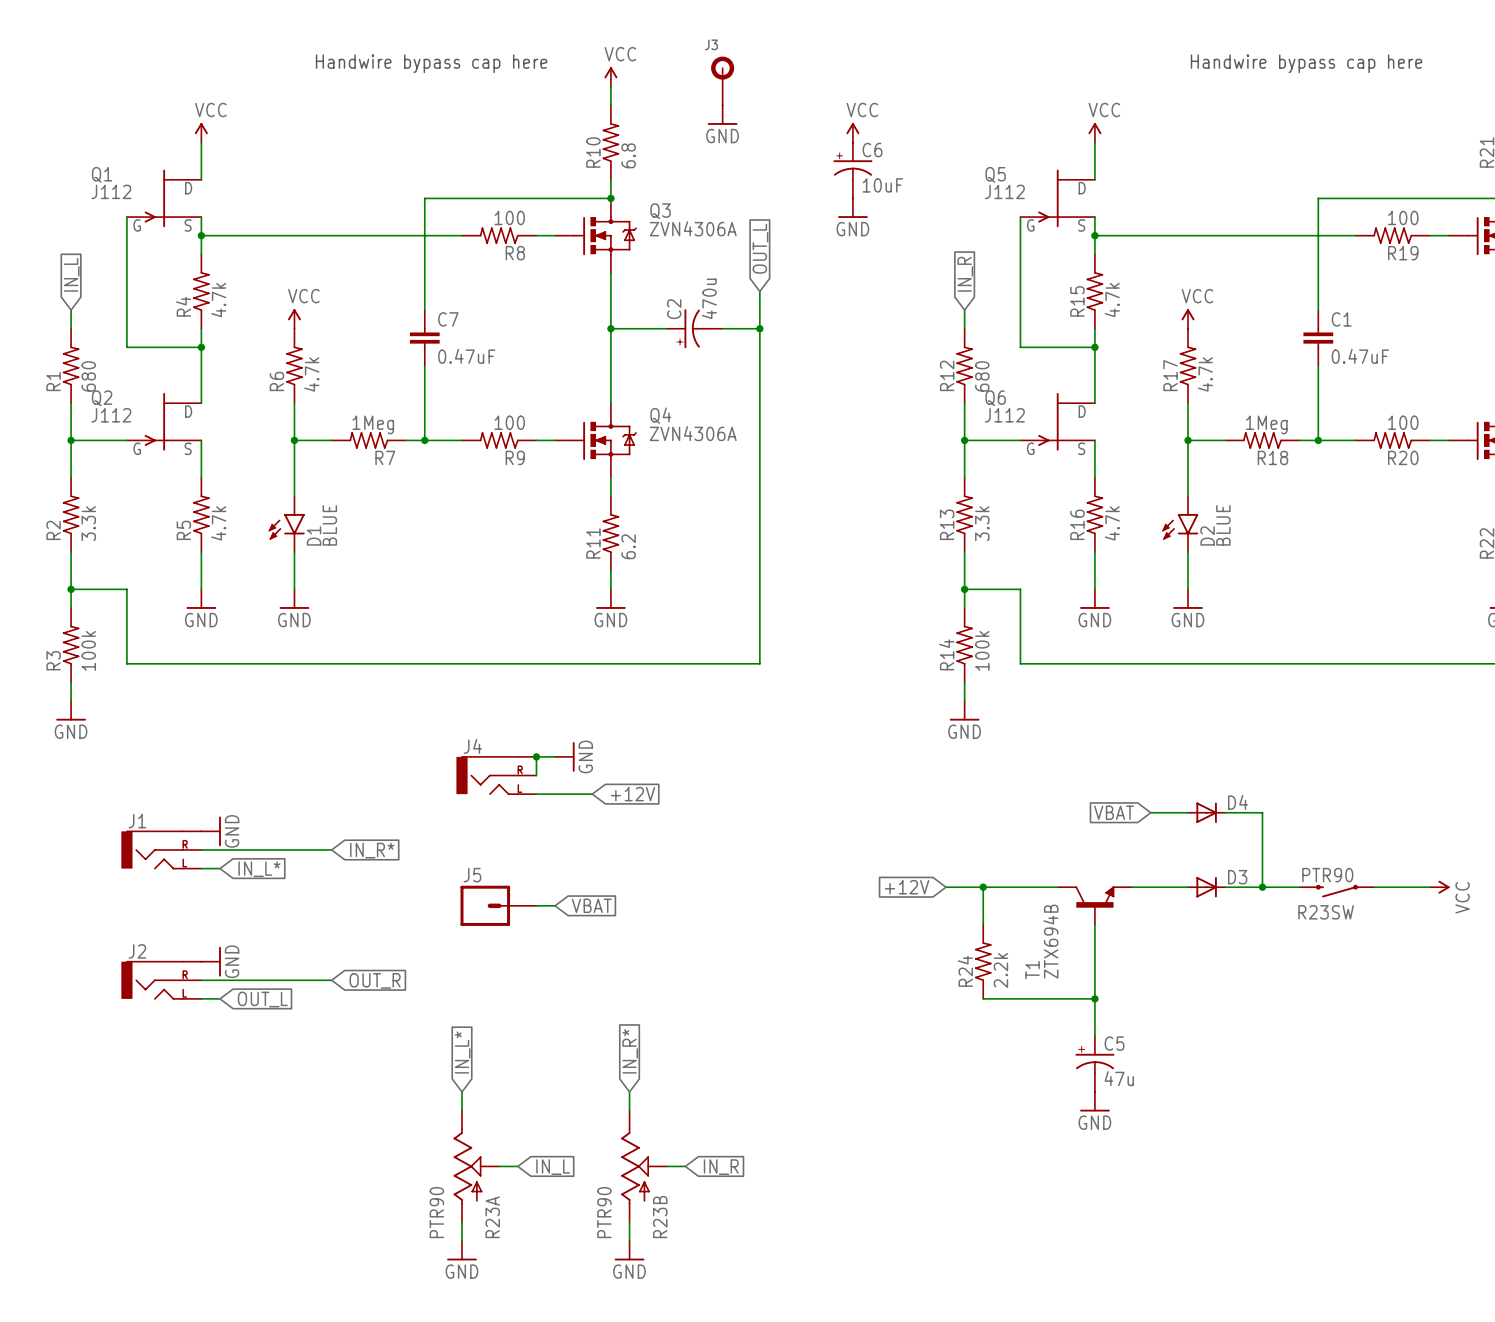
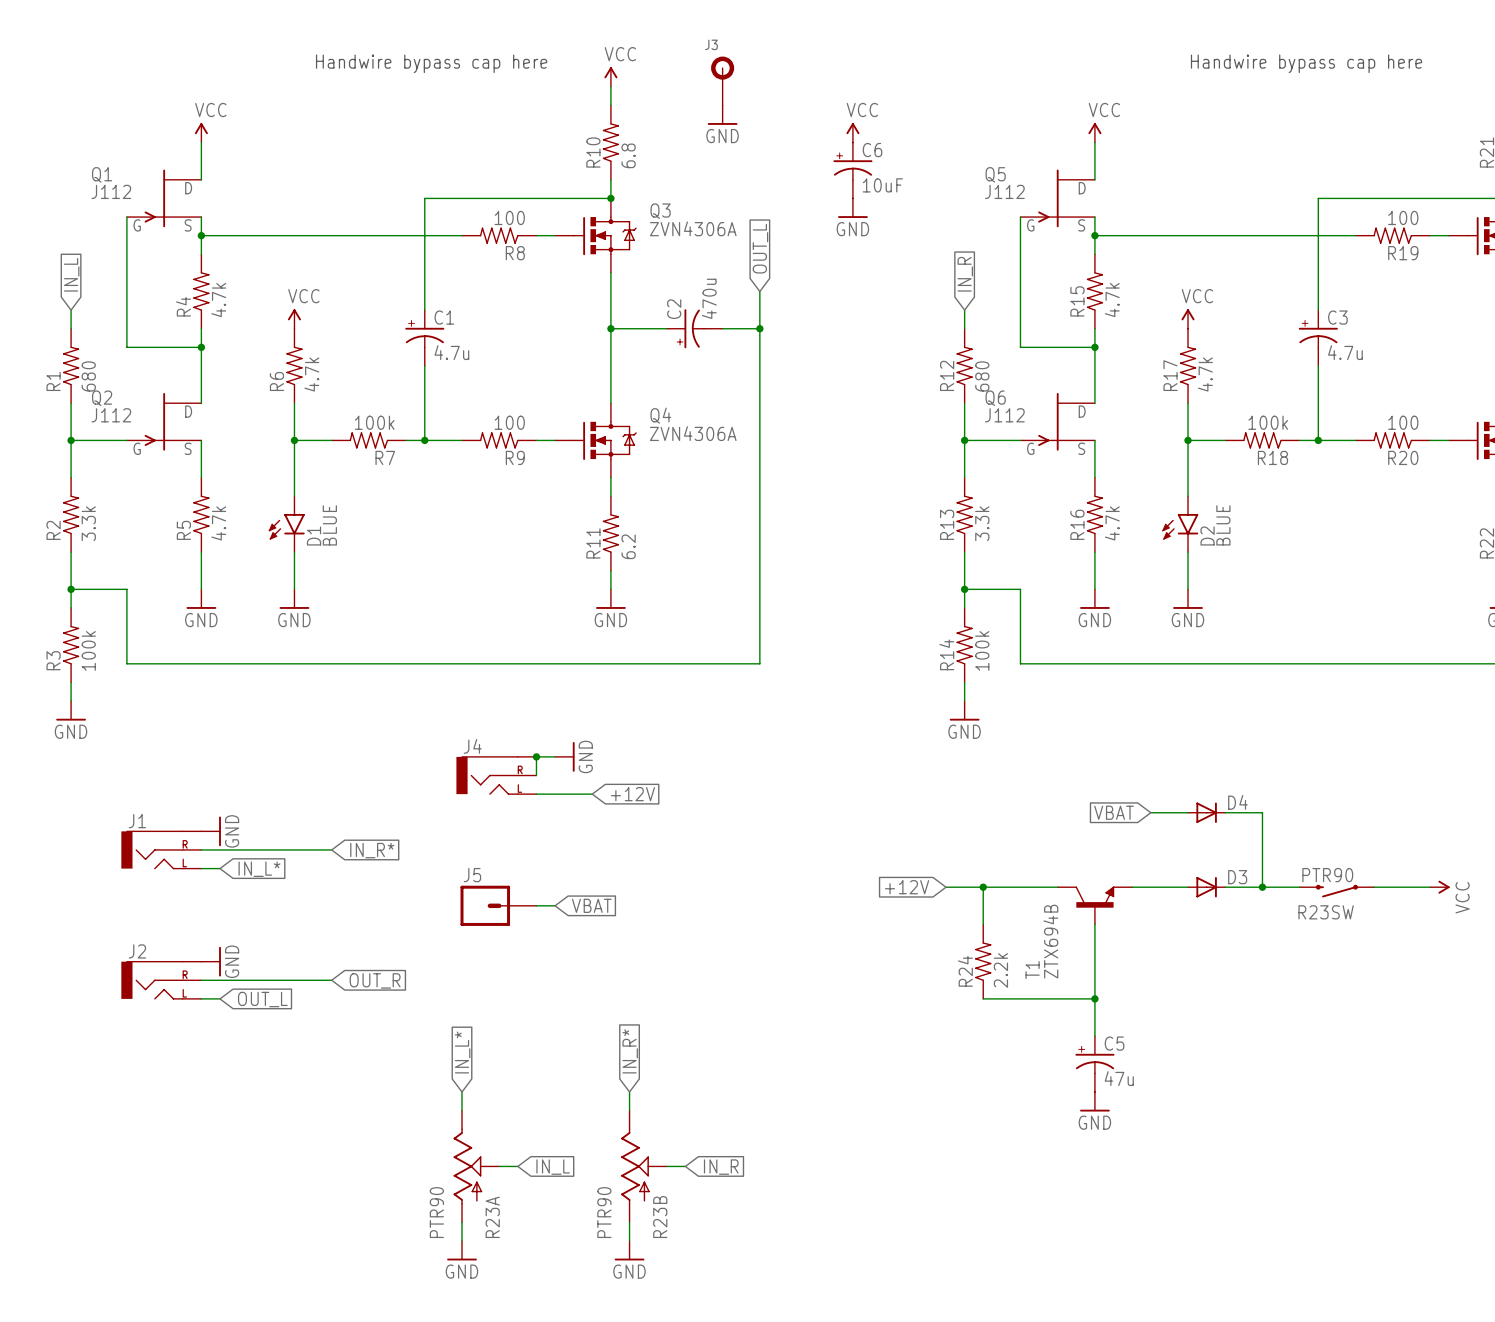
C1 symbol: [1303, 310, 1334, 366] -> [405, 310, 445, 366]
C7: 0.47uF (424, 338) -> none
C3: none -> 4.7u (1318, 338)
C1 value: 0.47uF (1360, 356) -> 4.7u (451, 352)
R7 value: 1Meg (373, 424) -> 100k (374, 422)
R18 value: 1Meg (1266, 424) -> 100k (1268, 422)

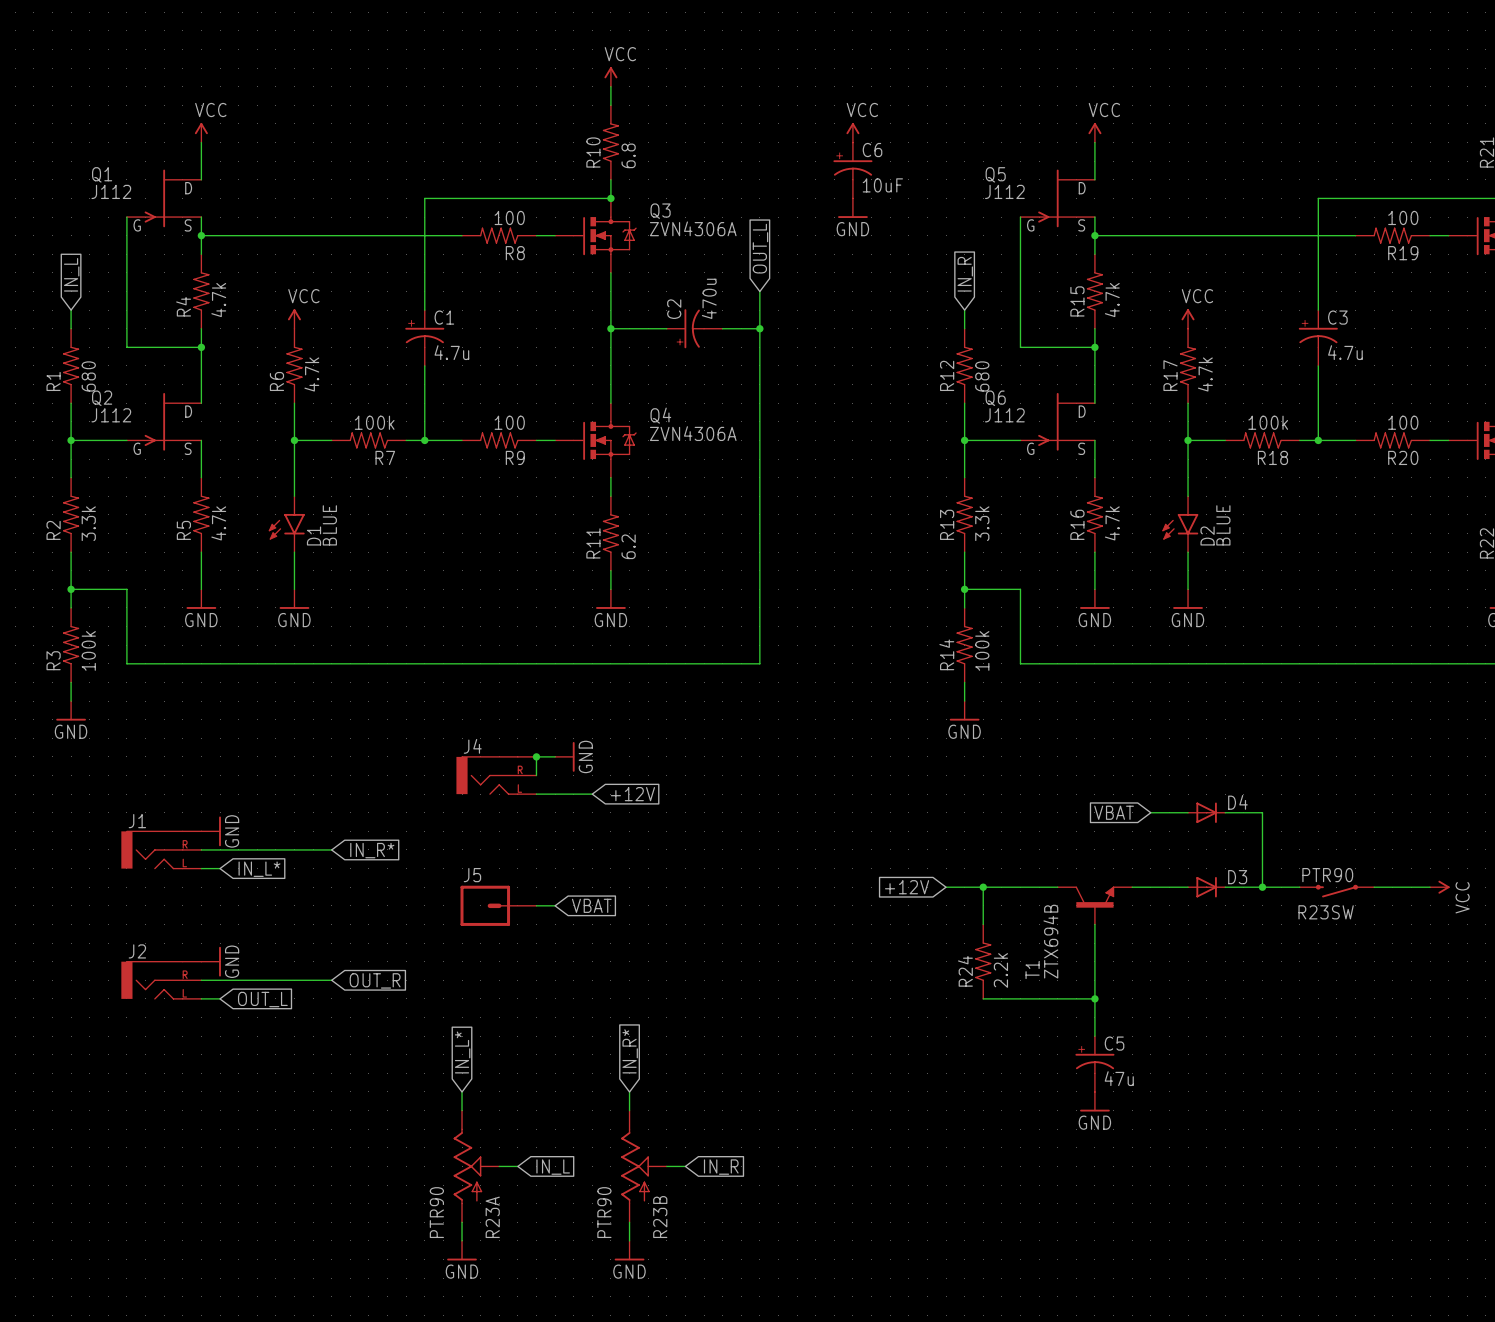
text: Handwire bypass cap here (431, 63) -> none
text: Handwire bypass cap here (1306, 63) -> none
J3: (722, 80) -> none
power symbol: GND (722, 115) -> none

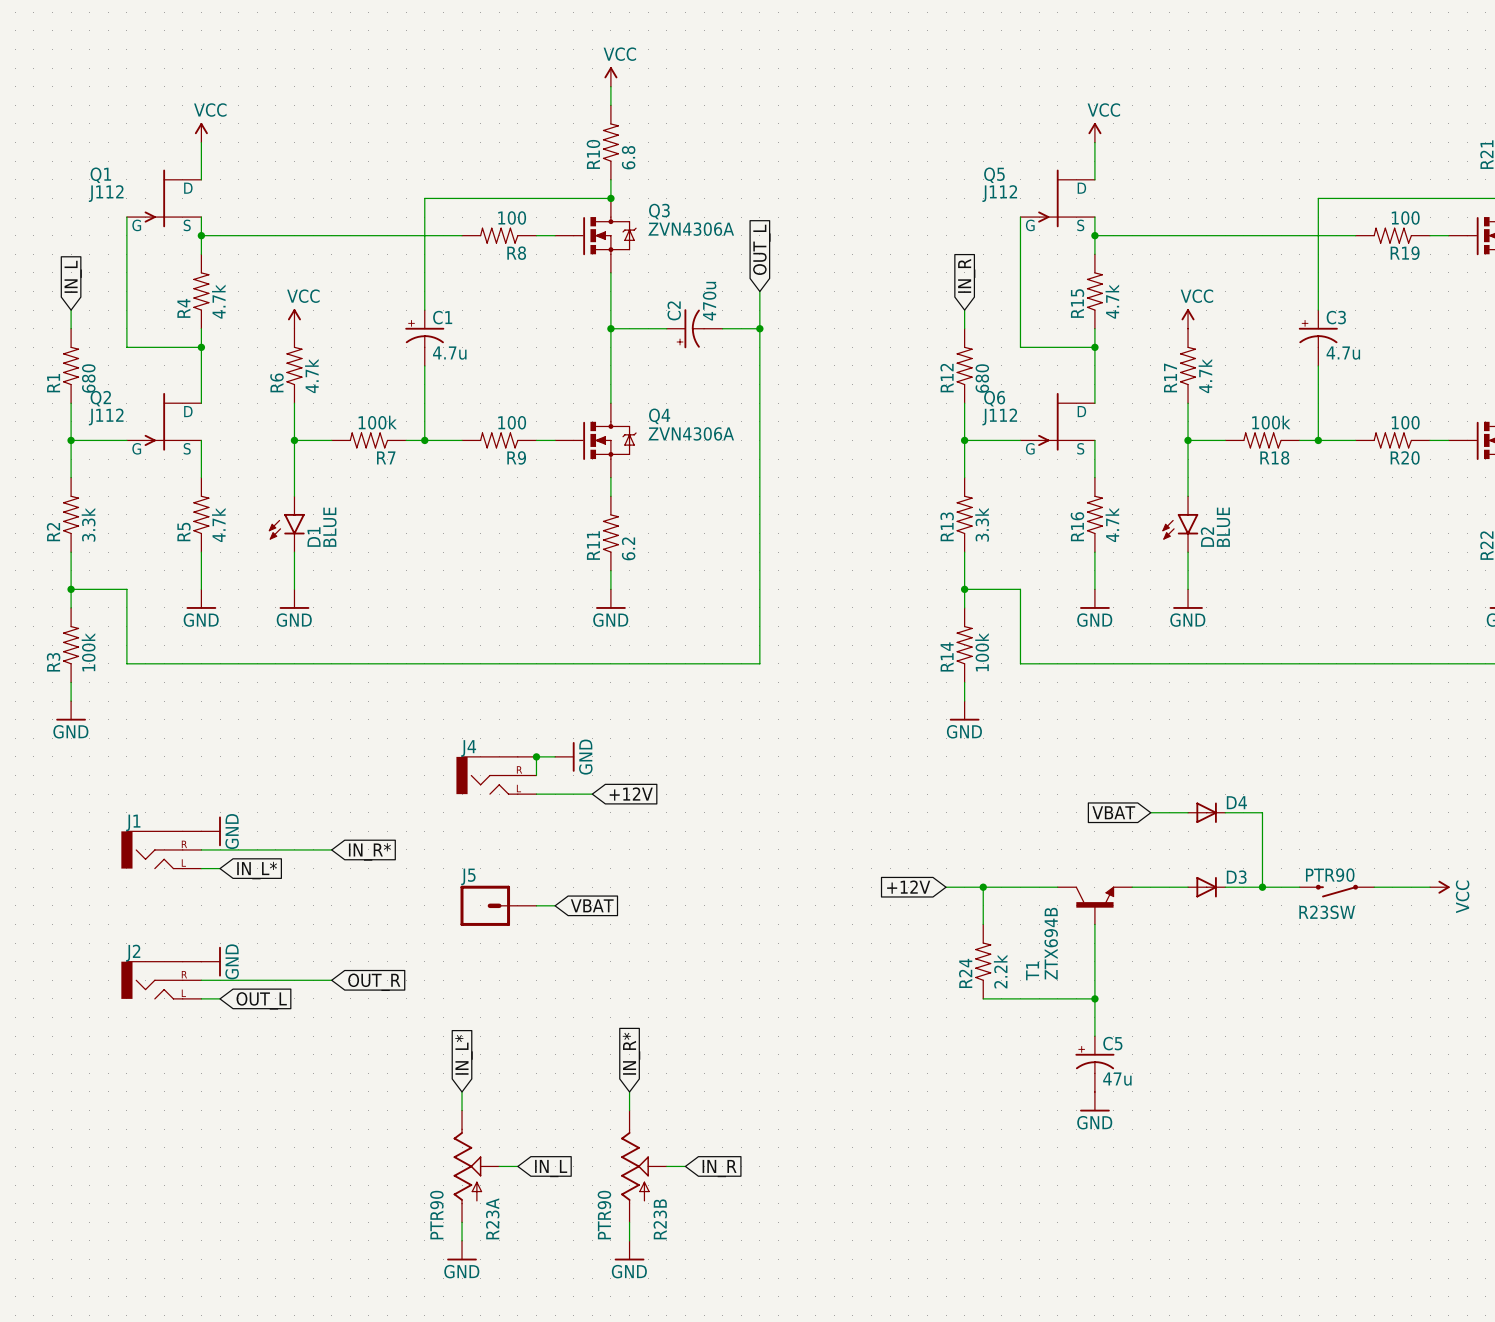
power symbol: VCC (852, 132) -> none
C6: 10uF (852, 170) -> none
power symbol: GND (852, 208) -> none

